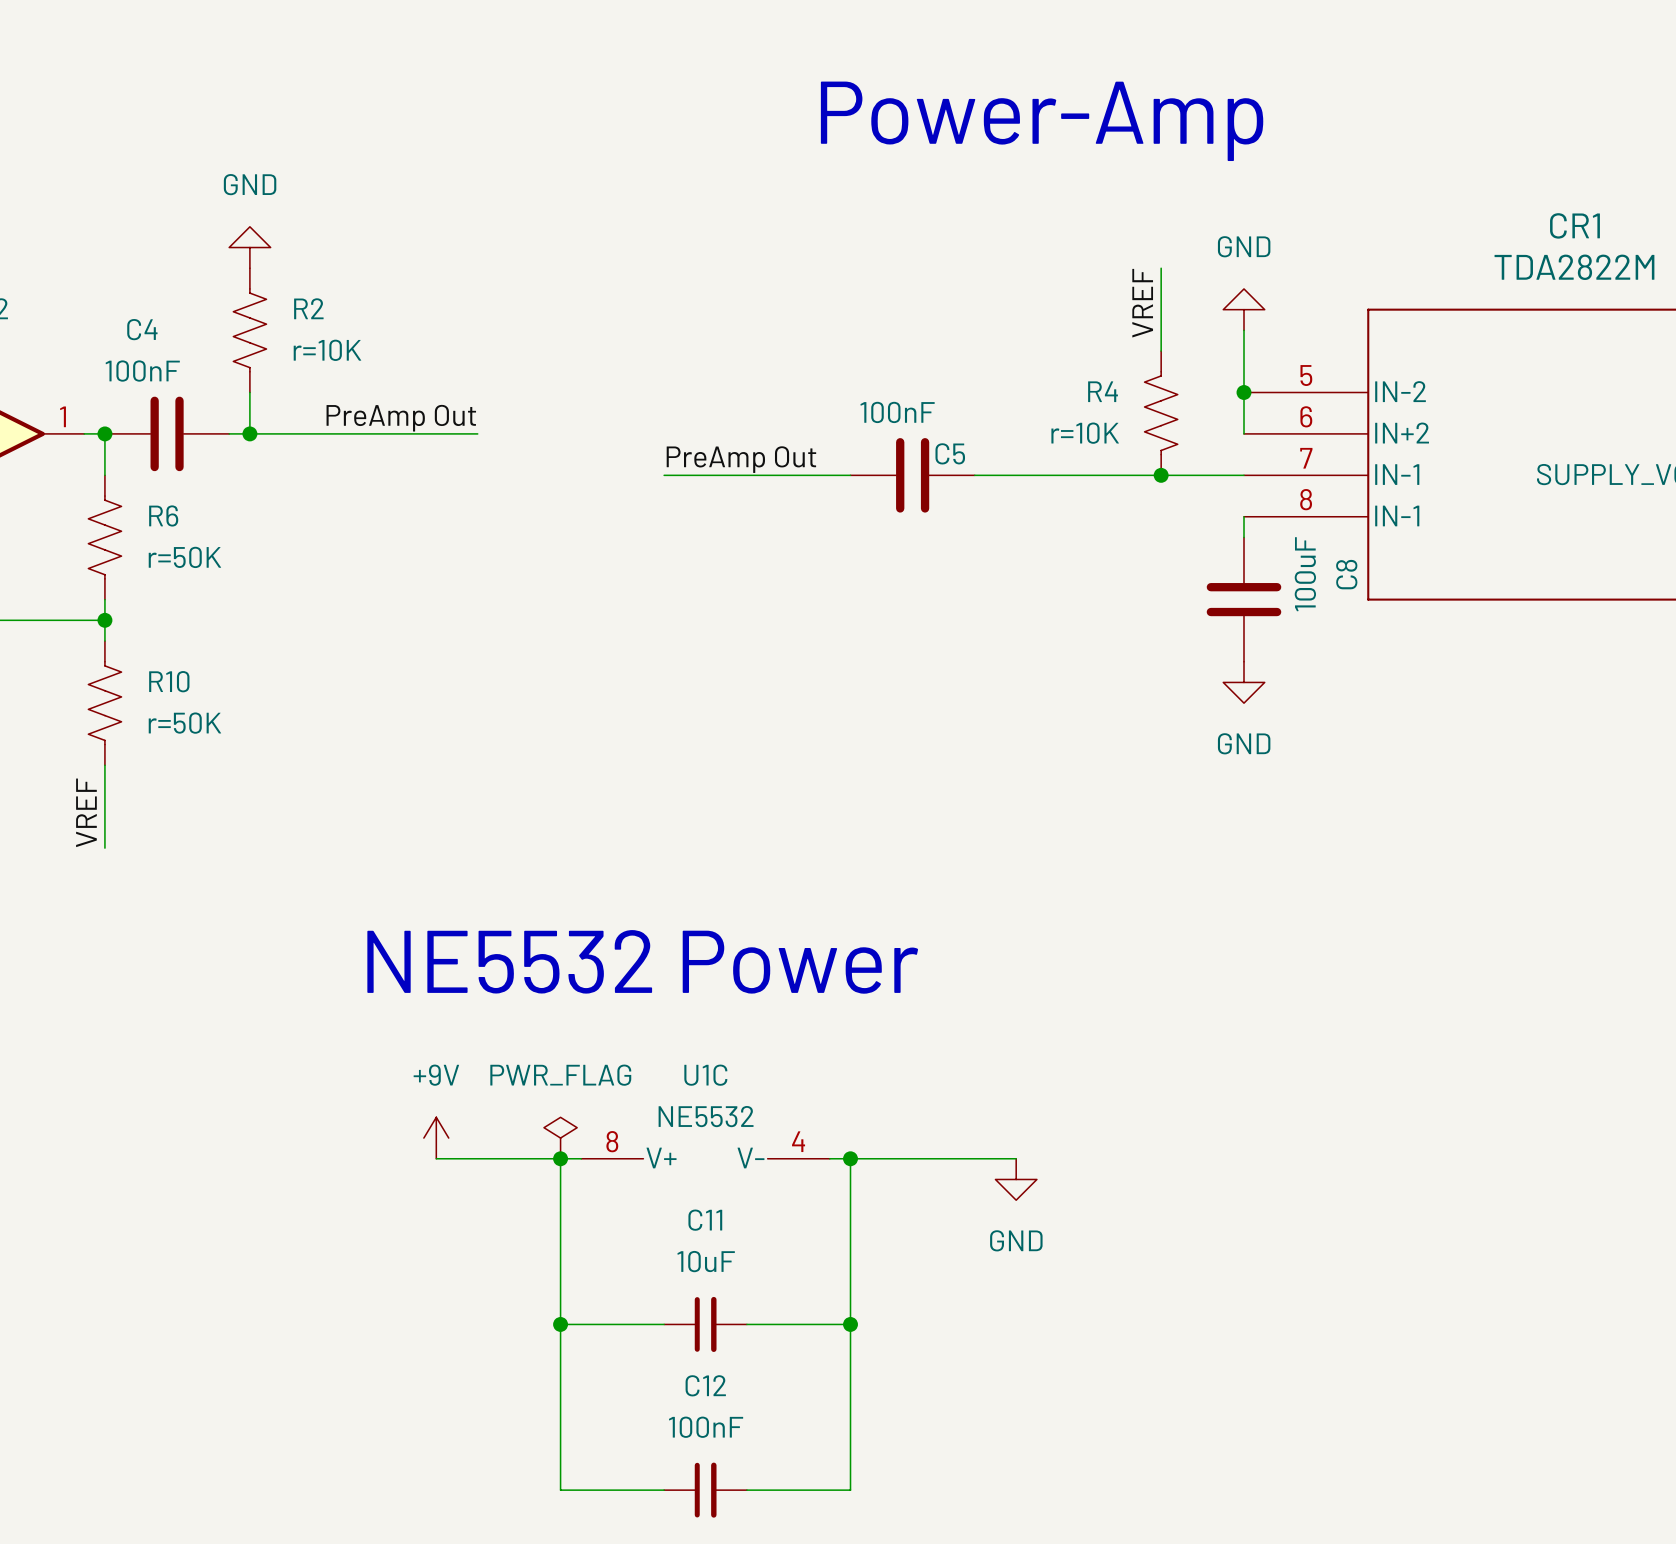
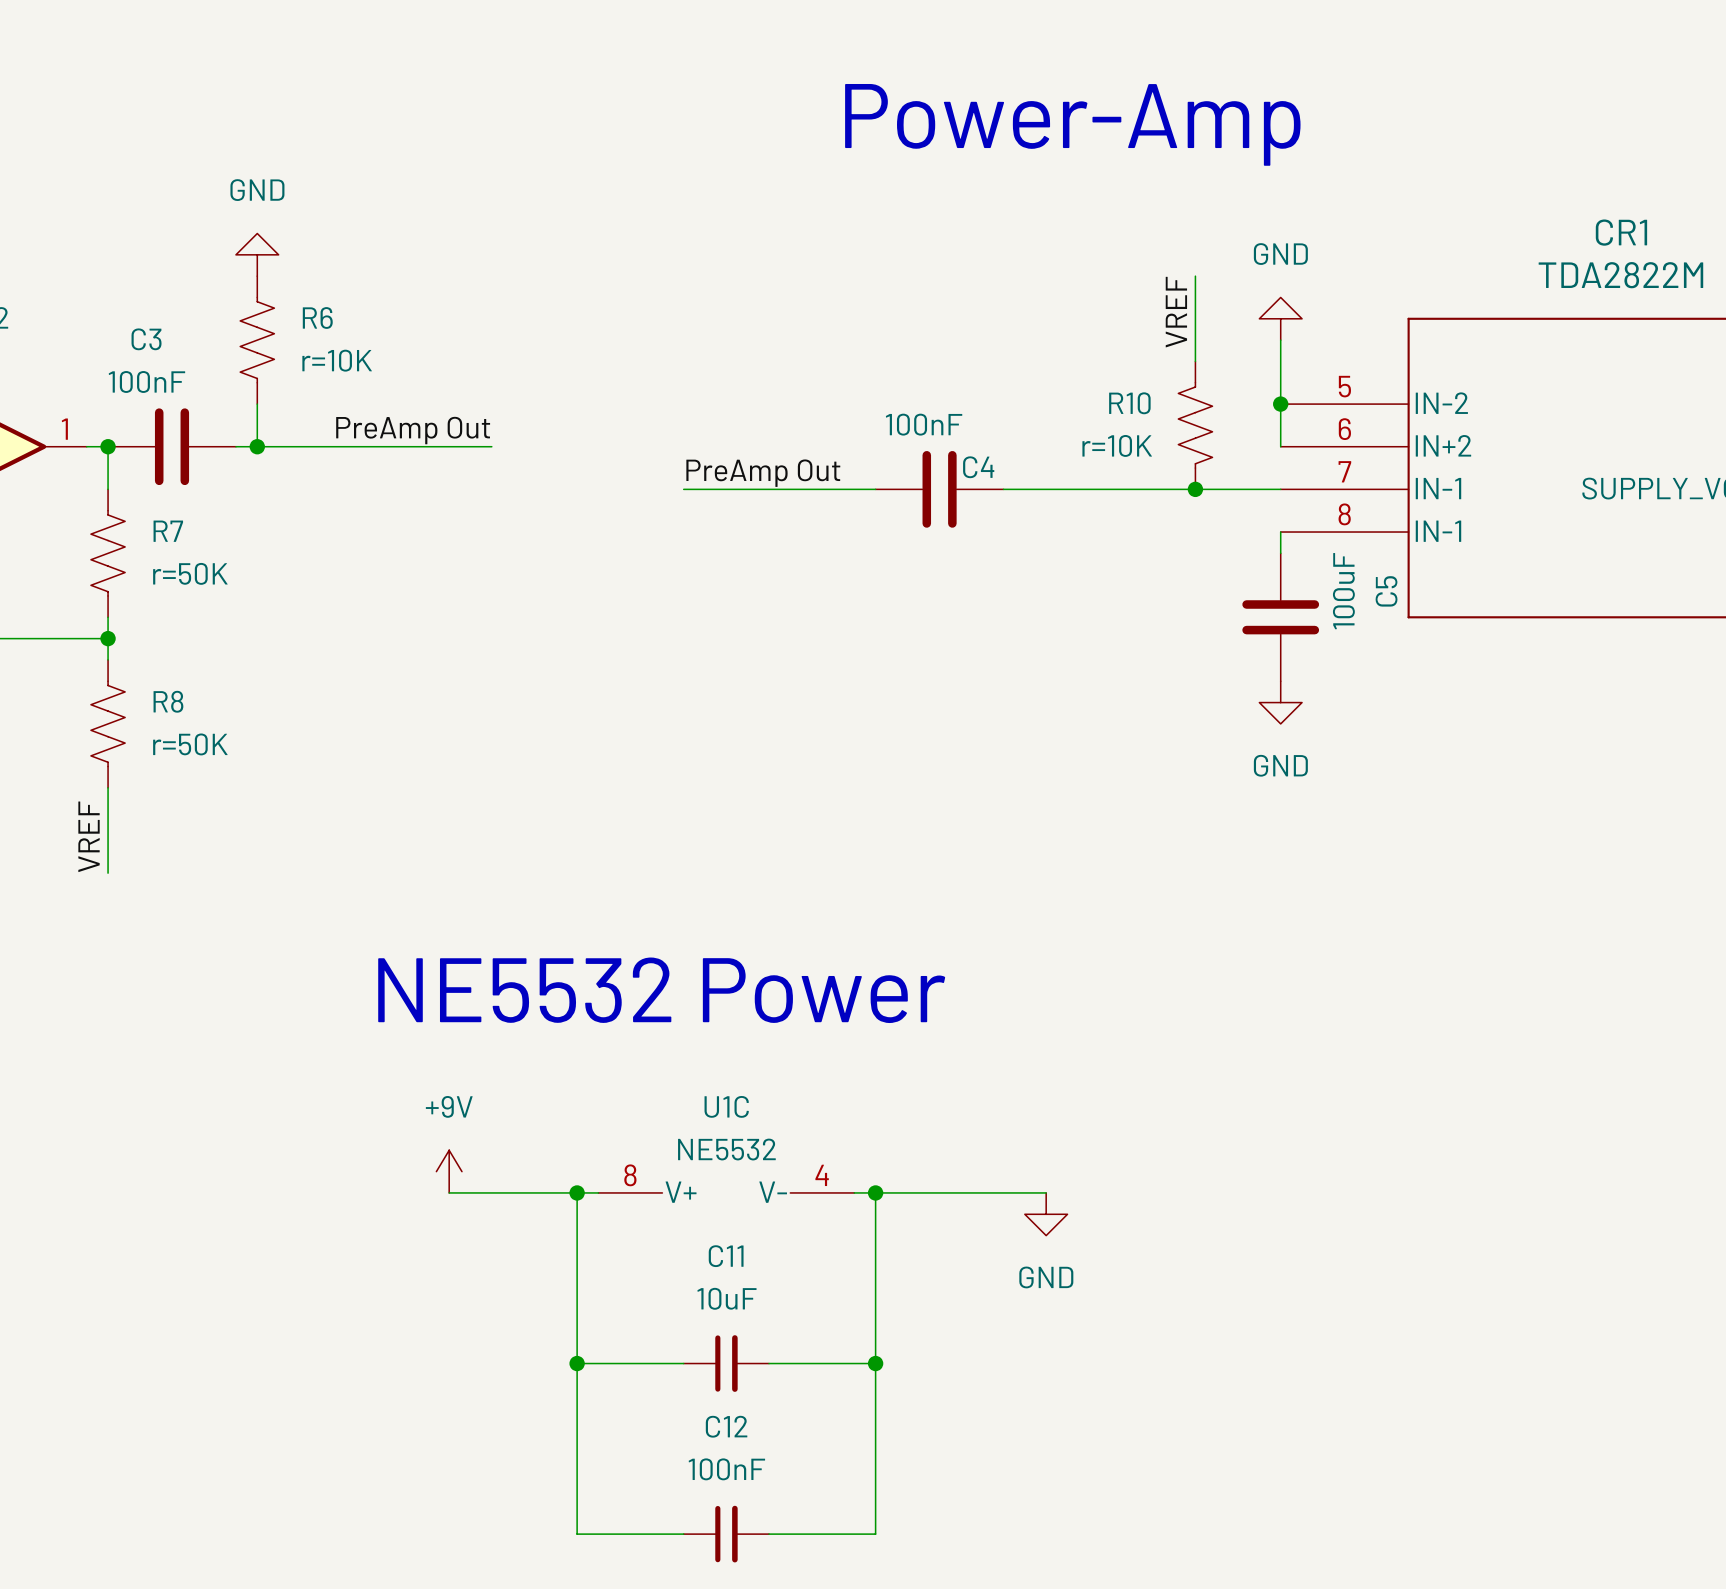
R2 name: R2 (308, 308) -> R6 (317, 317)
C4 name: C4 (142, 329) -> C3 (146, 339)
R4 name: R4 (1103, 391) -> R10 (1129, 403)
C5 name: C5 (950, 453) -> C4 (978, 467)
R6 name: R6 (163, 515) -> R7 (168, 531)
C8 name: C8 (1346, 574) -> C5 (1386, 591)
R10 name: R10 (169, 681) -> R8 (168, 701)
power symbol: PWR_FLAG (560, 1138) -> none

